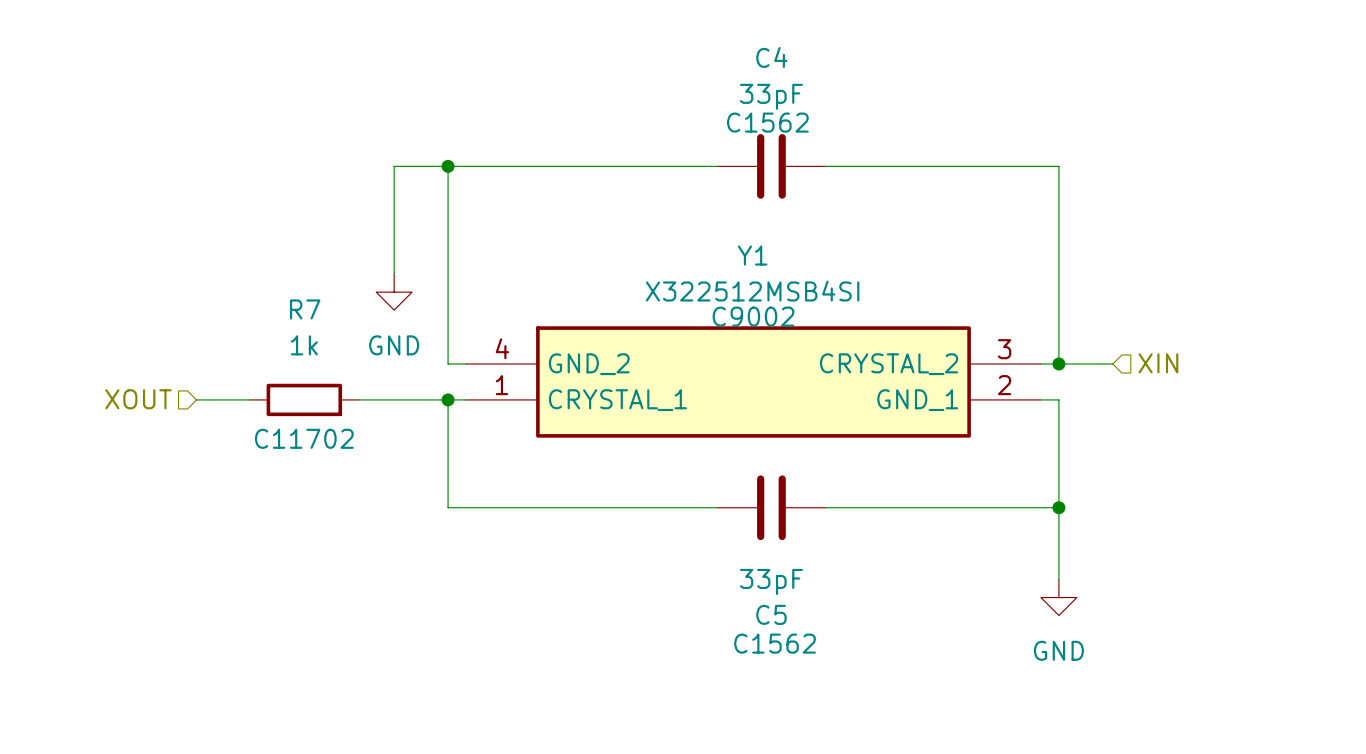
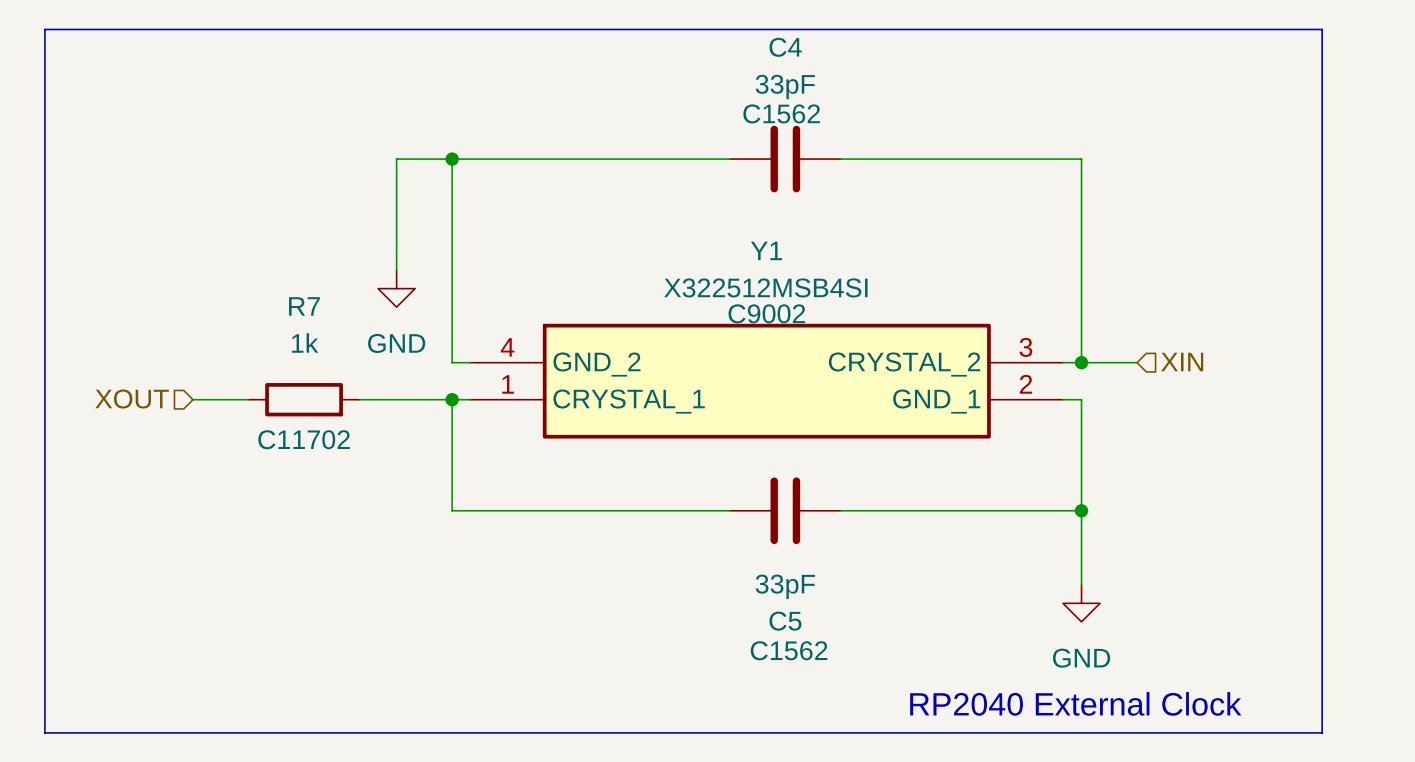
line: none -> (44, 29) (1322, 29) (1322, 732) (44, 732) (44, 29)
text: none -> RP2040 External Clock (1075, 703)

